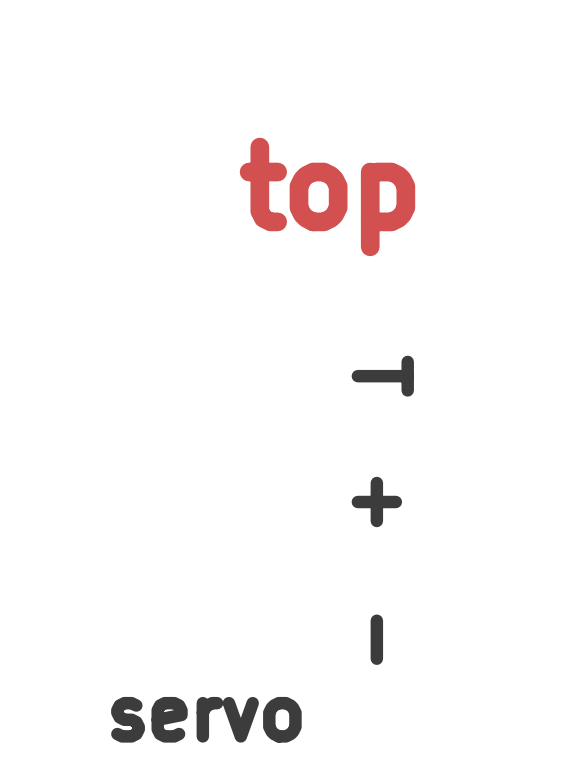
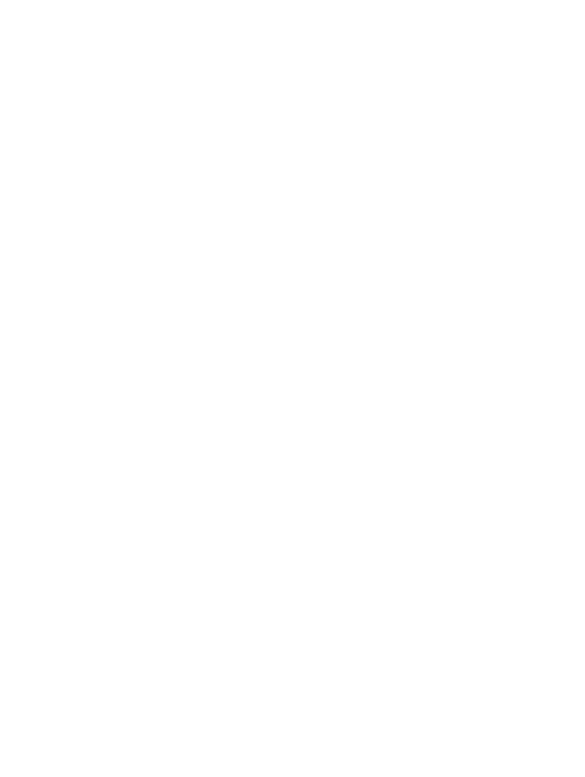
text: top (327, 196) -> none
text: T + - (382, 510) -> none
text: servo (206, 719) -> none

